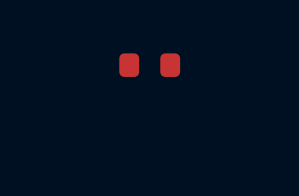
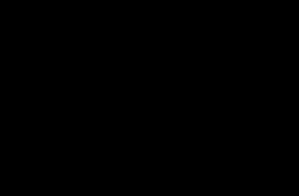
part: (149, 65) -> none

